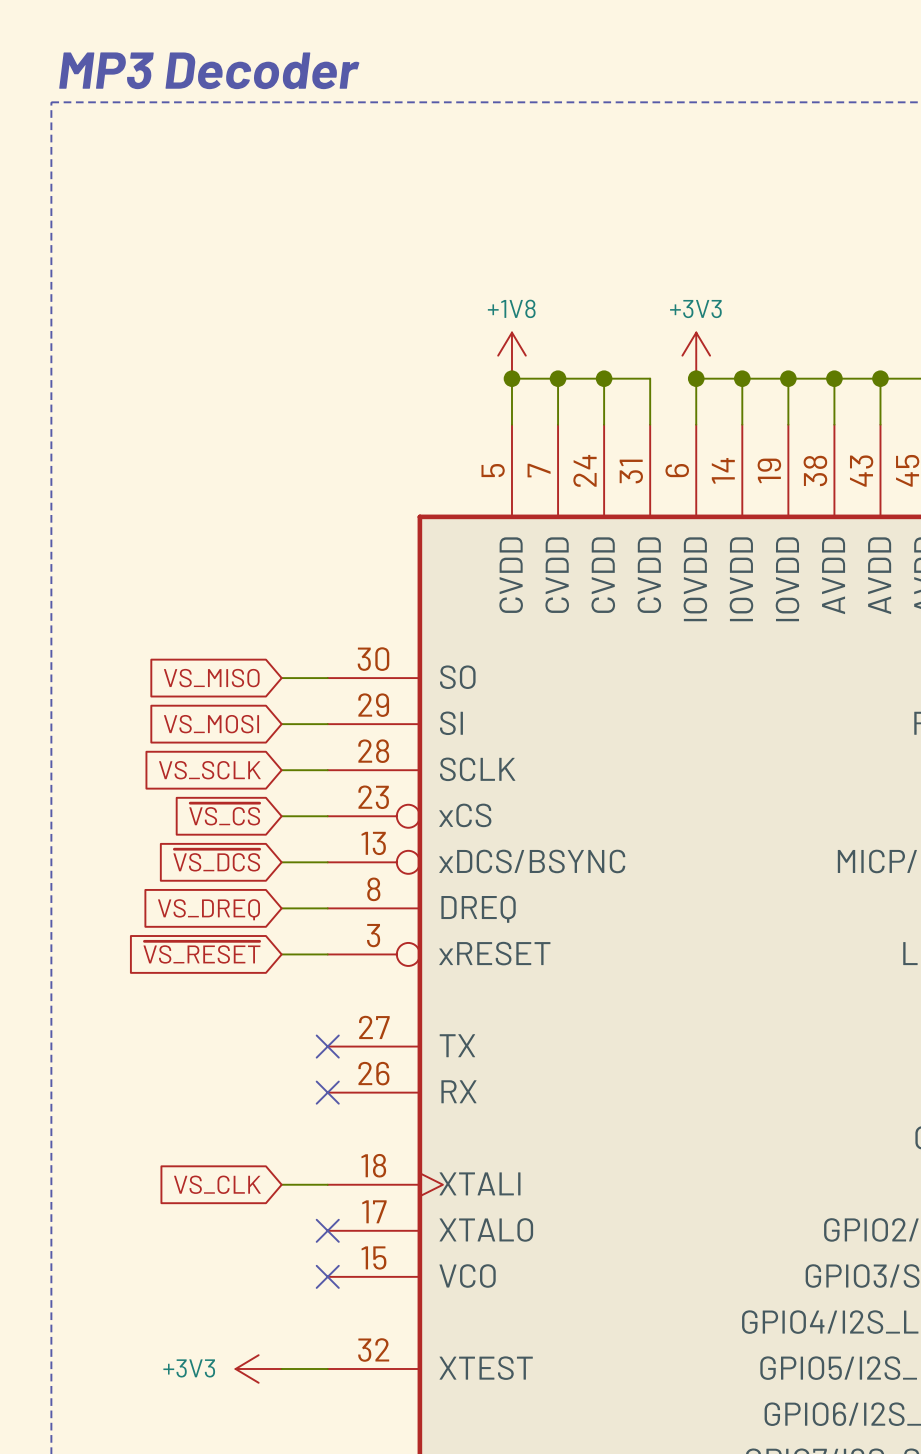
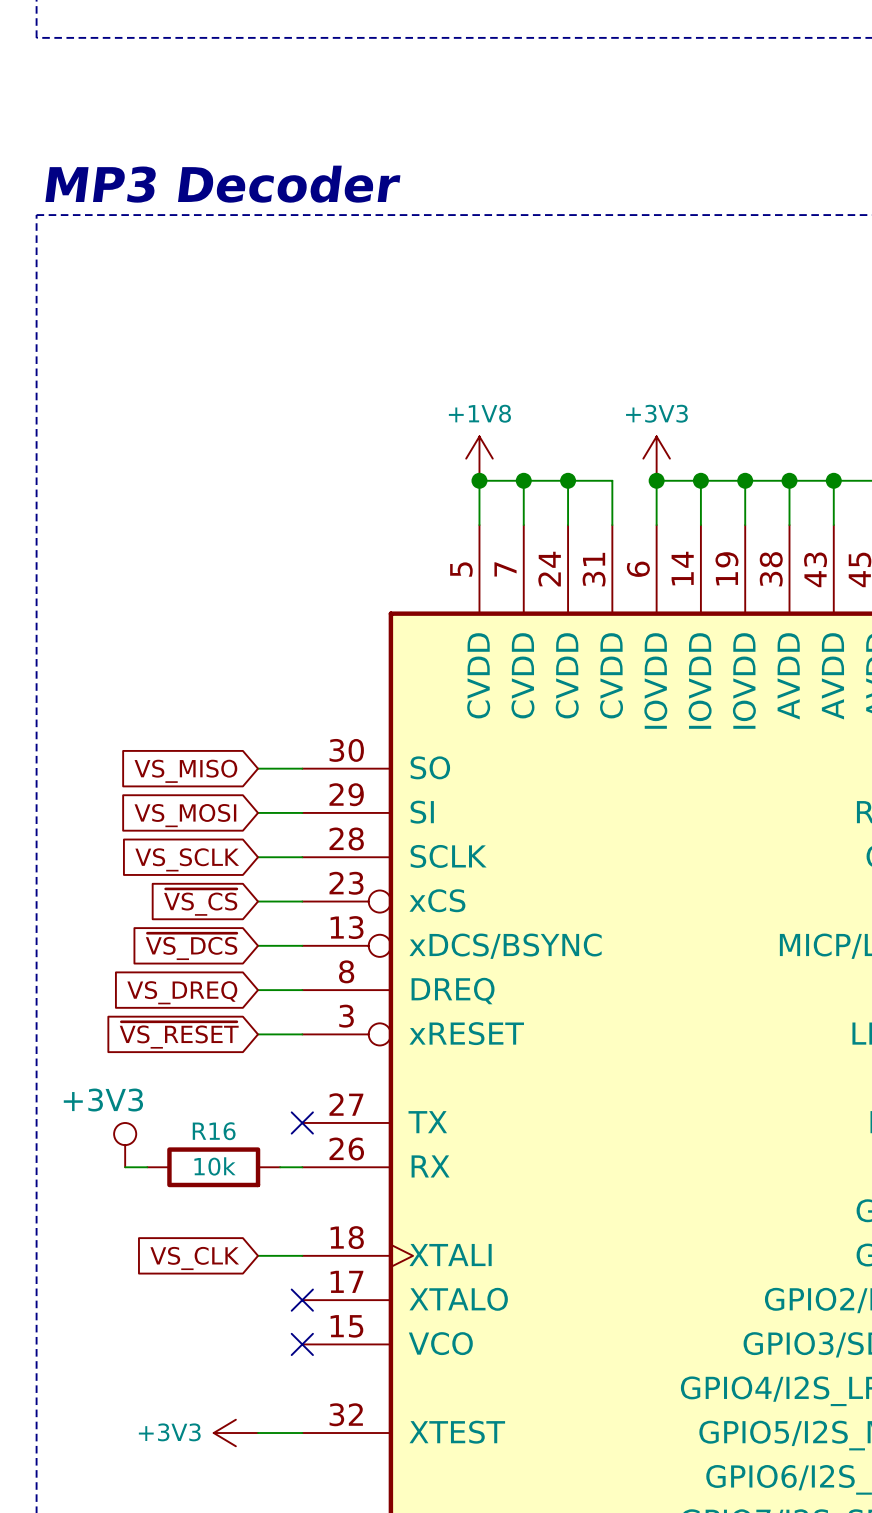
power symbol: none -> +3V3 (125, 1145)
wire: none -> (125, 1167) (147, 1167)
R16: none -> 10k (213, 1167)
wire: none -> (280, 1167) (302, 1167)
no-connect mark: (327, 1092) -> none

